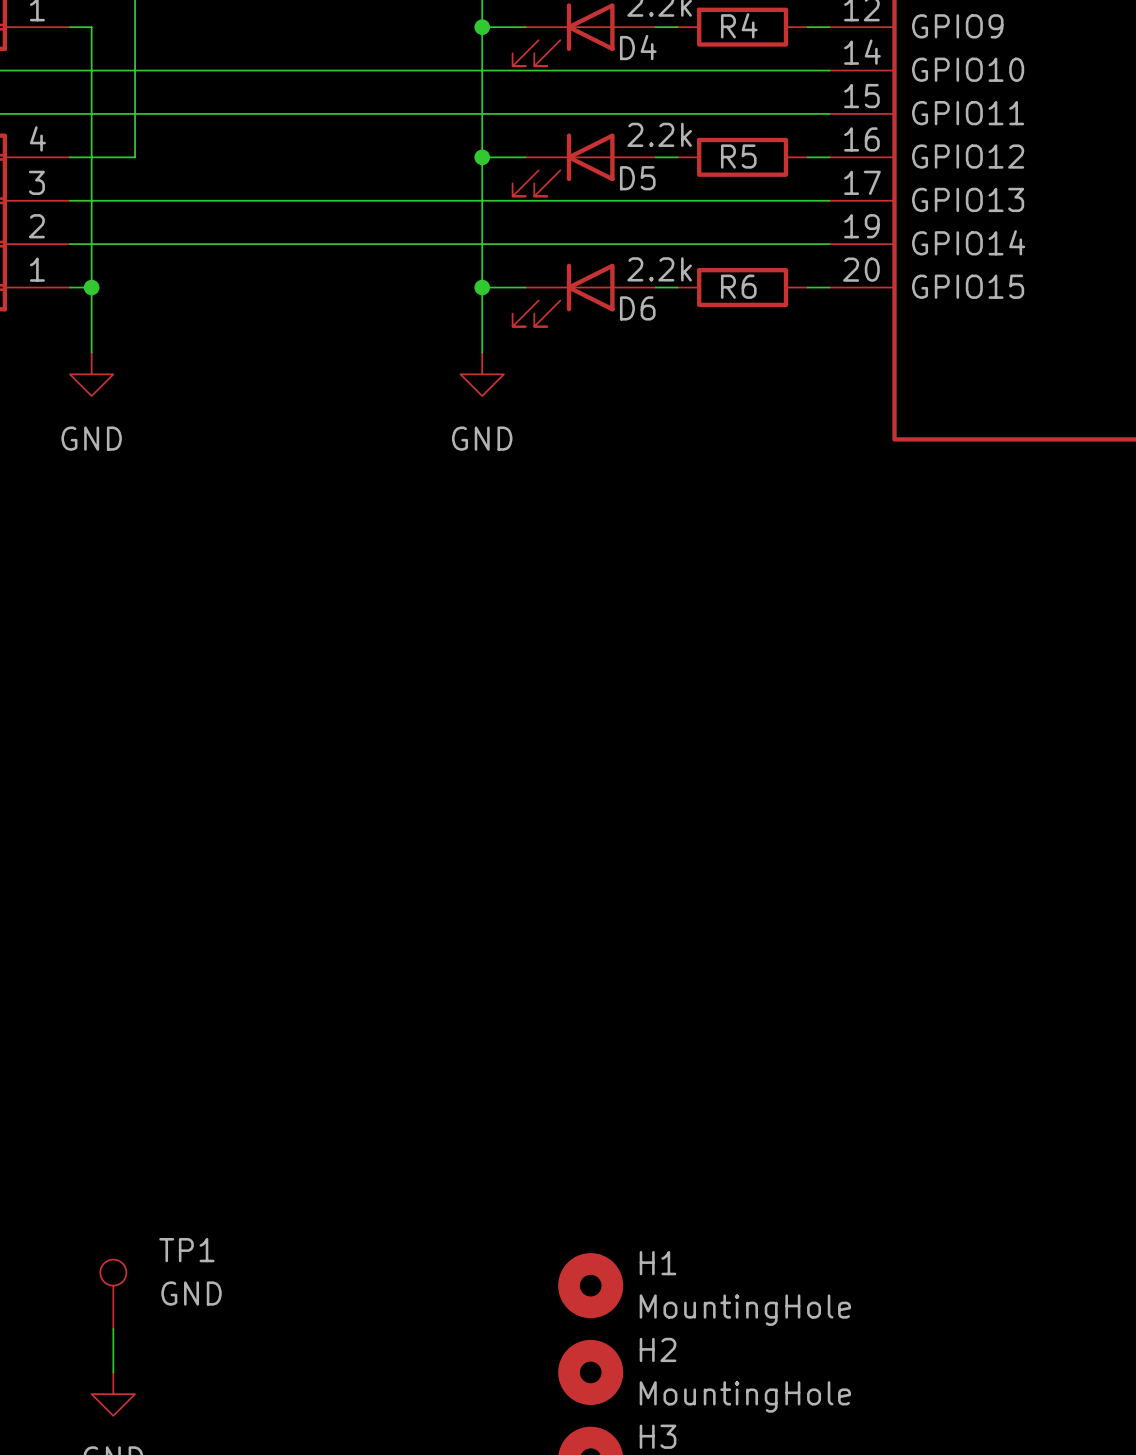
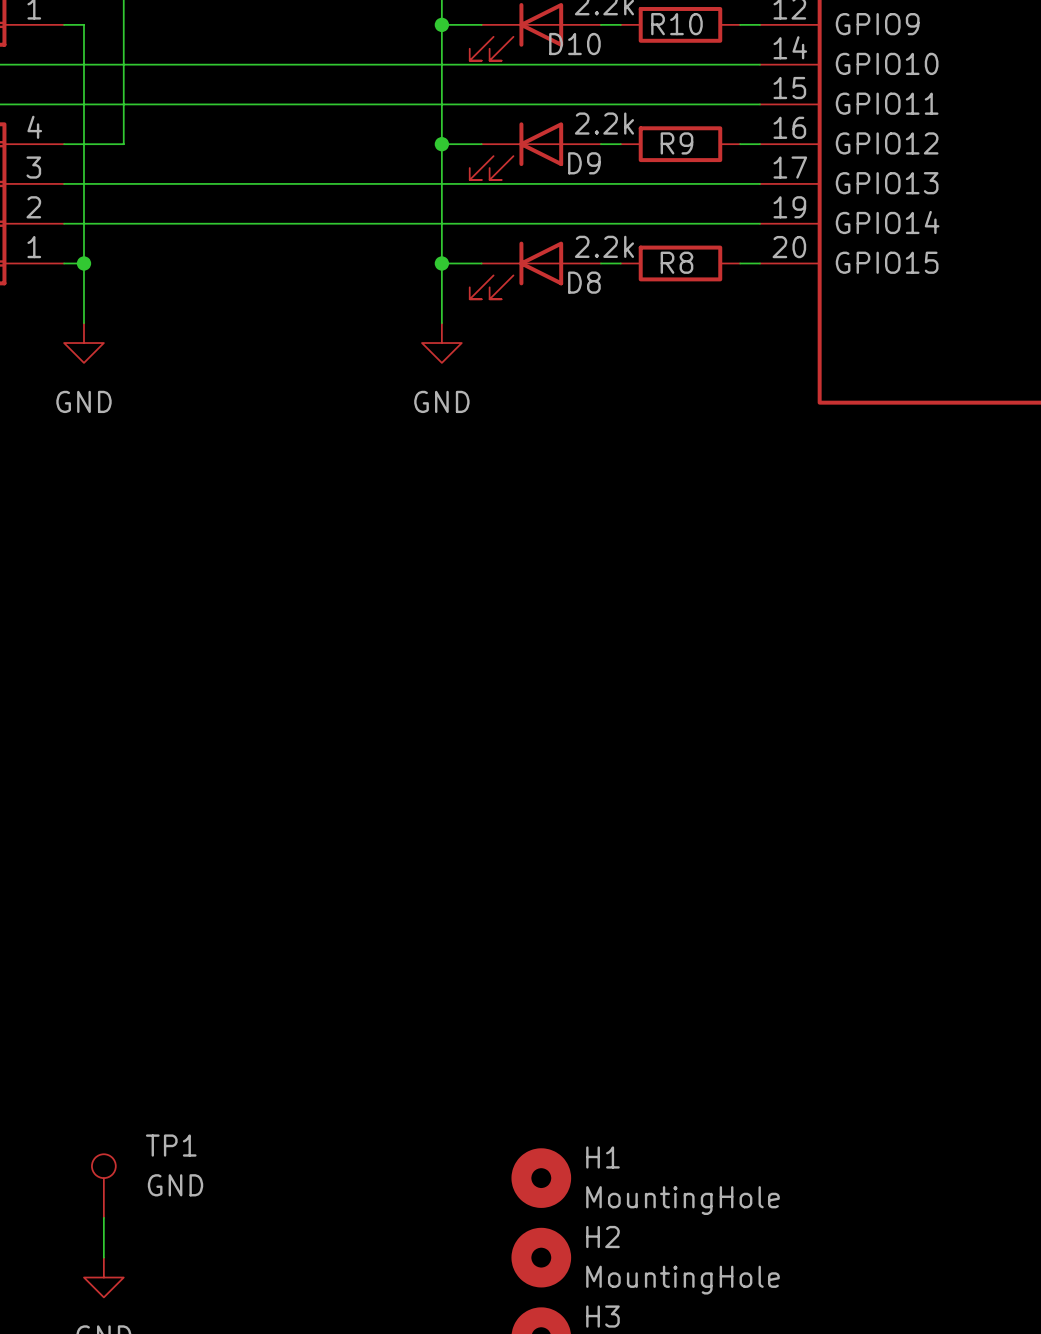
R4 name: R4 (739, 25) -> R10 (676, 24)
D4 name: D4 (638, 47) -> D10 (574, 44)
R5 name: R5 (738, 156) -> R9 (676, 143)
D5 name: D5 (637, 178) -> D9 (584, 163)
R6 name: R6 (738, 286) -> R8 (676, 262)
D6 name: D6 (637, 308) -> D8 (584, 282)

